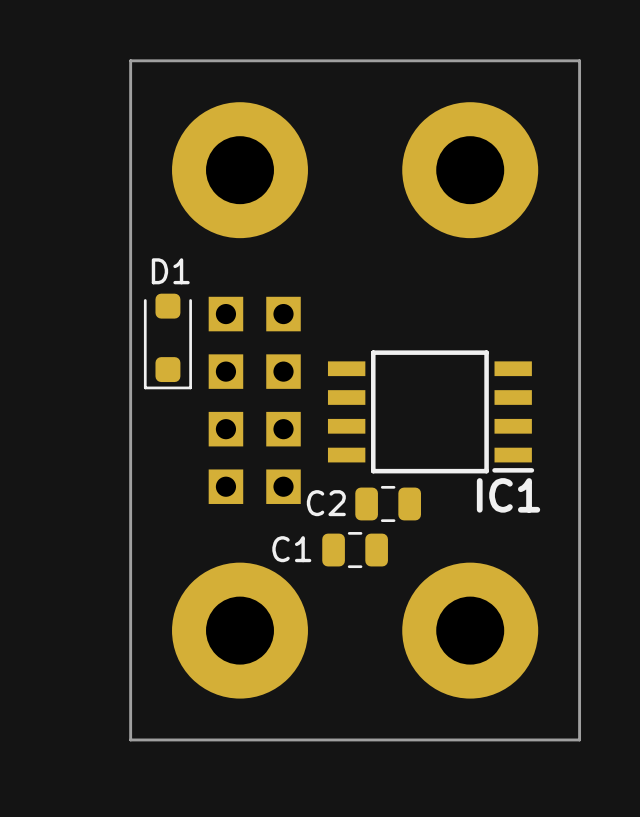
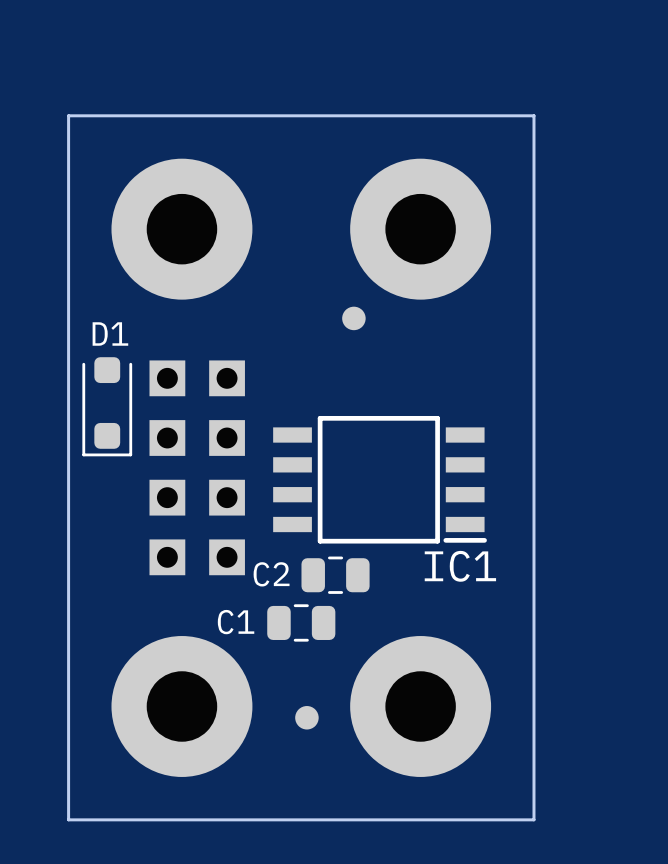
part: none -> (353, 318)
part: none -> (306, 717)

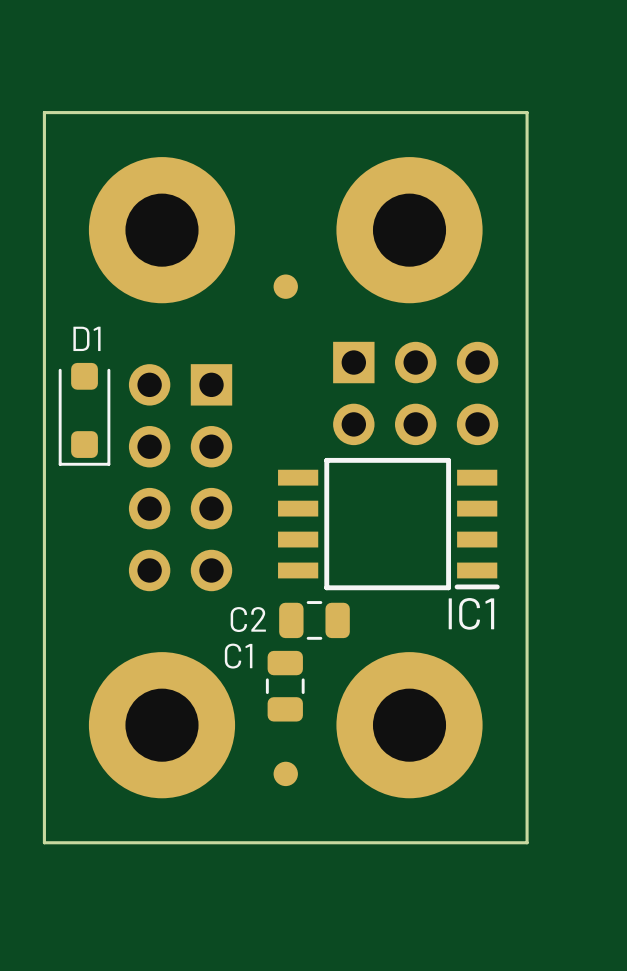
part position: (353, 318) -> (285, 286)
part footprint: [149, 360, 245, 576] -> [128, 364, 233, 592]
part: none -> (415, 393)
IC1 position: (380, 479) -> (388, 524)
C2 position: (335, 575) -> (314, 620)
C1 rotation: 0° (301, 622) -> 90° clockwise (285, 686)
C1 position: (301, 622) -> (285, 686)
part position: (306, 717) -> (285, 773)

